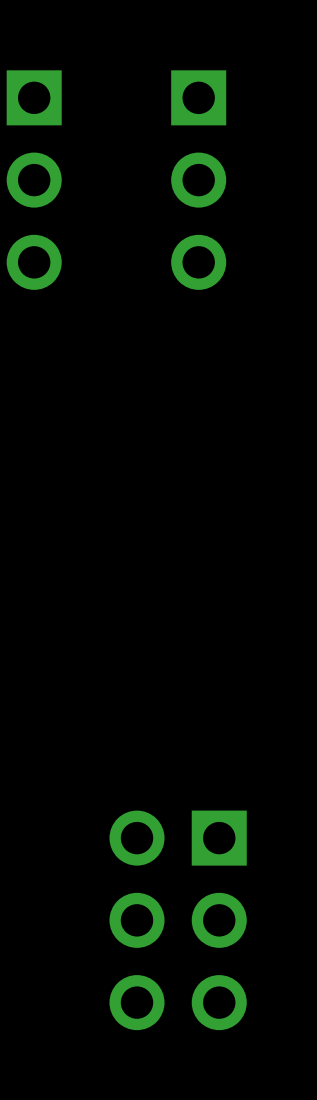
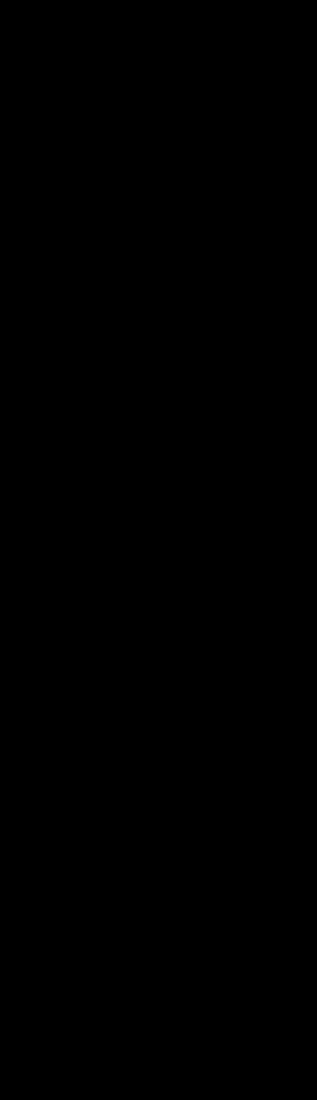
part: (34, 180) -> none
part: (198, 180) -> none
part: (178, 920) -> none

